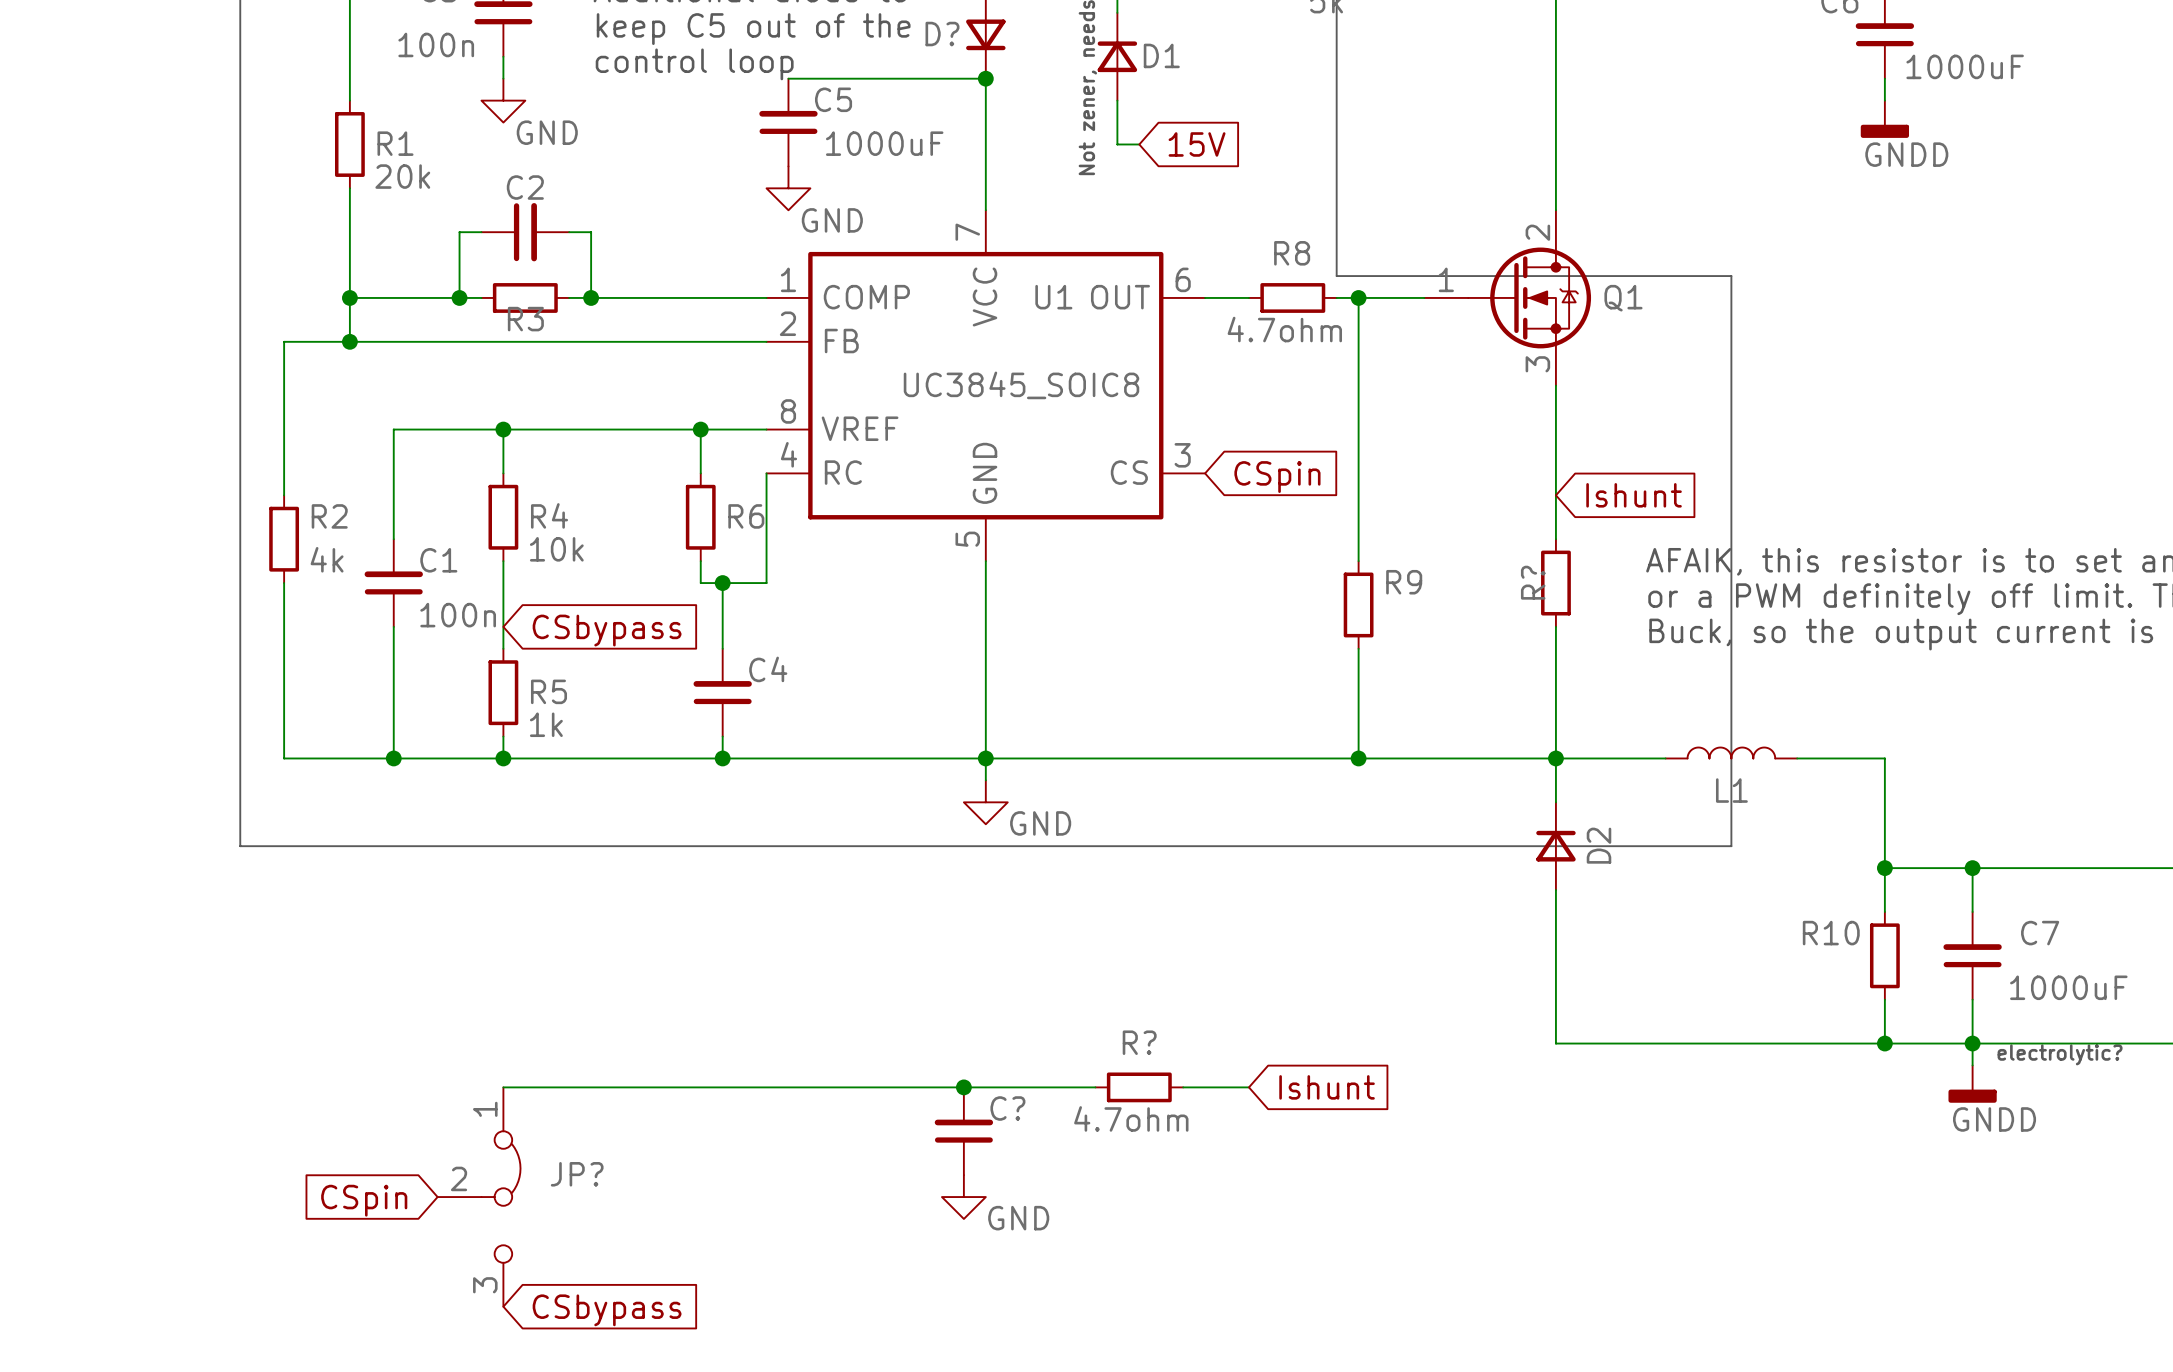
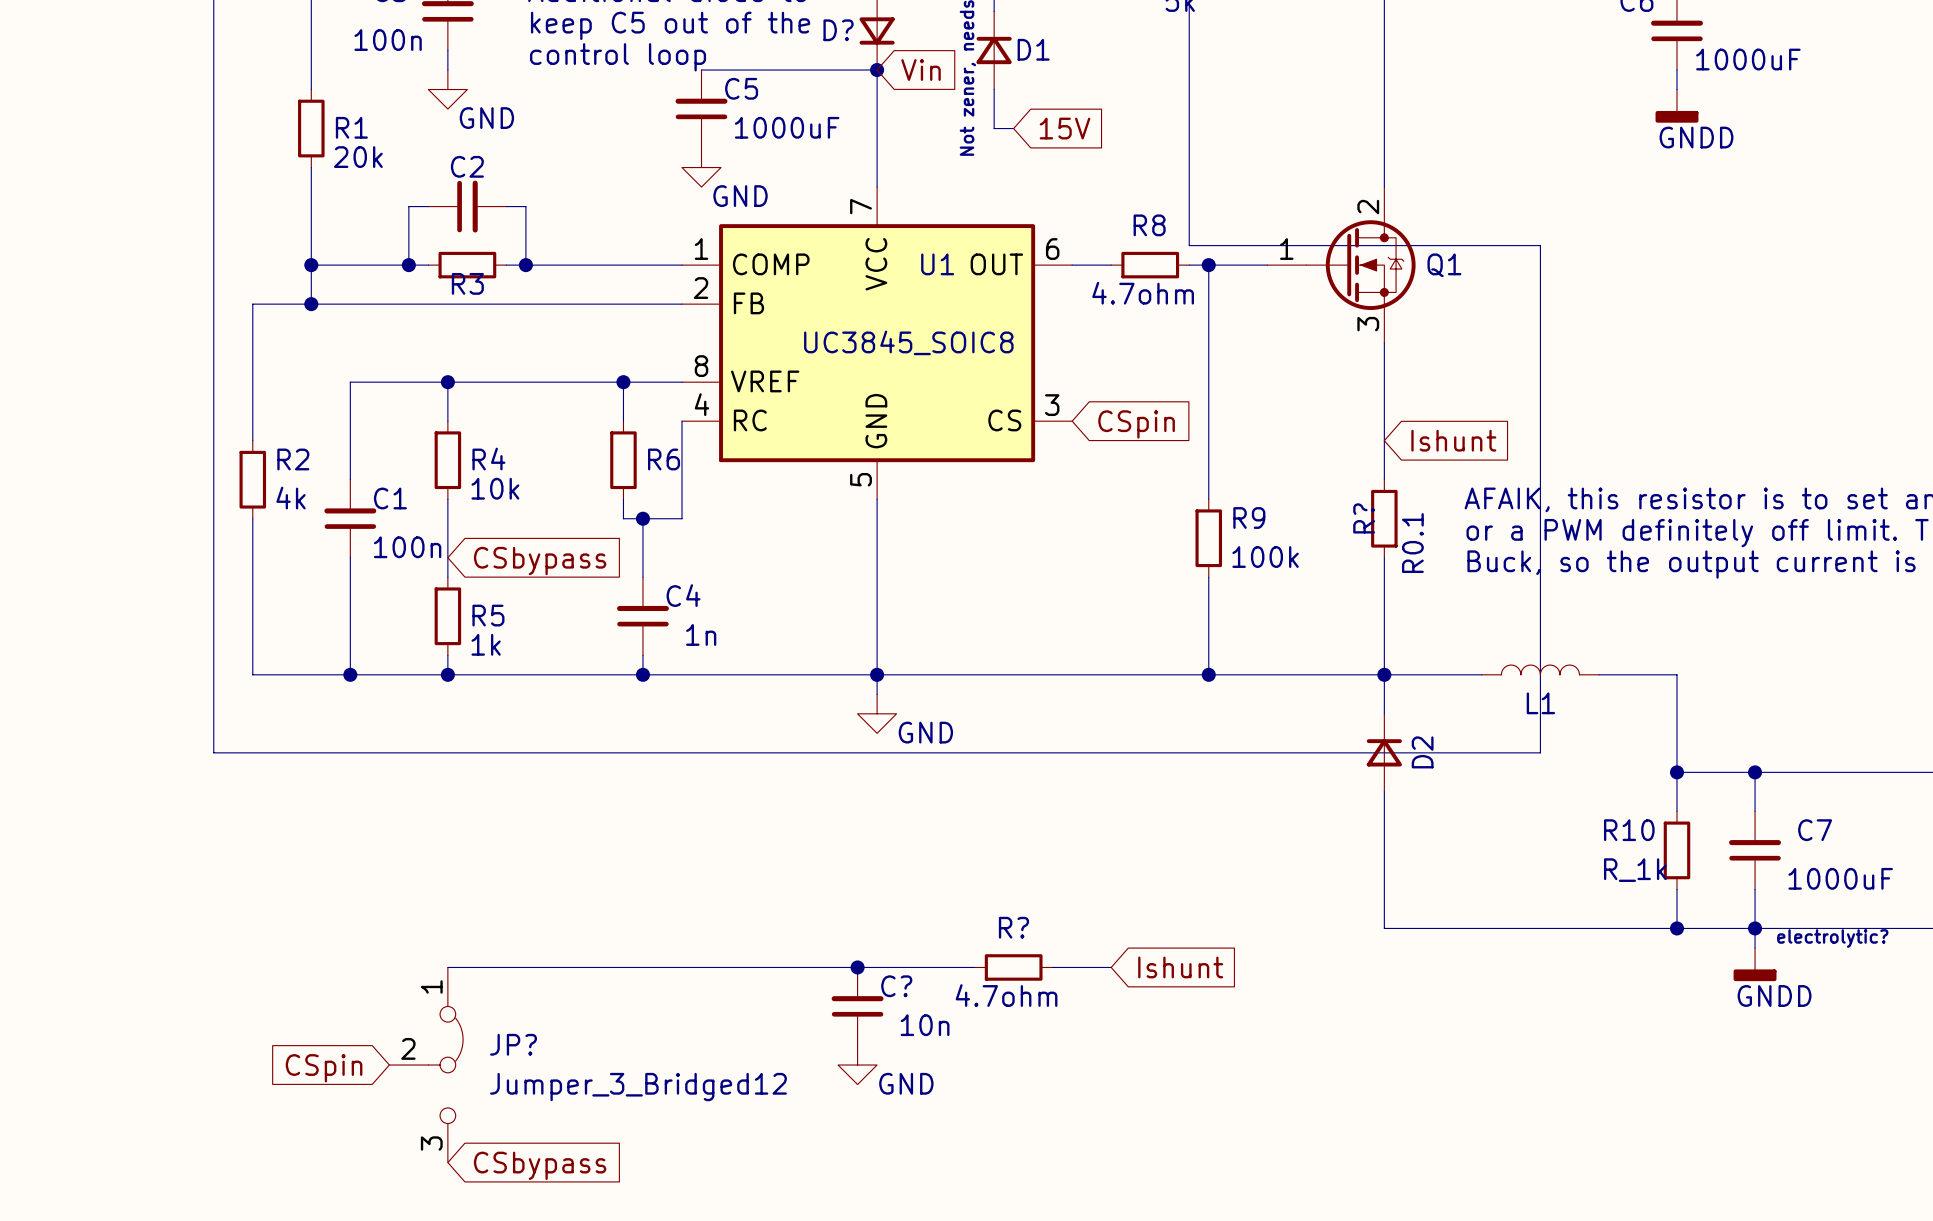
global label: none -> Vin (921, 70)
R? value: none -> R0.1 (1412, 543)
R9 value: none -> 100k (1265, 557)
C4 value: none -> 1n (701, 634)
R10 value: none -> R_1k (1635, 870)
C? value: none -> 10n (925, 1025)
JP? value: none -> Jumper_3_Bridged12 (638, 1087)

